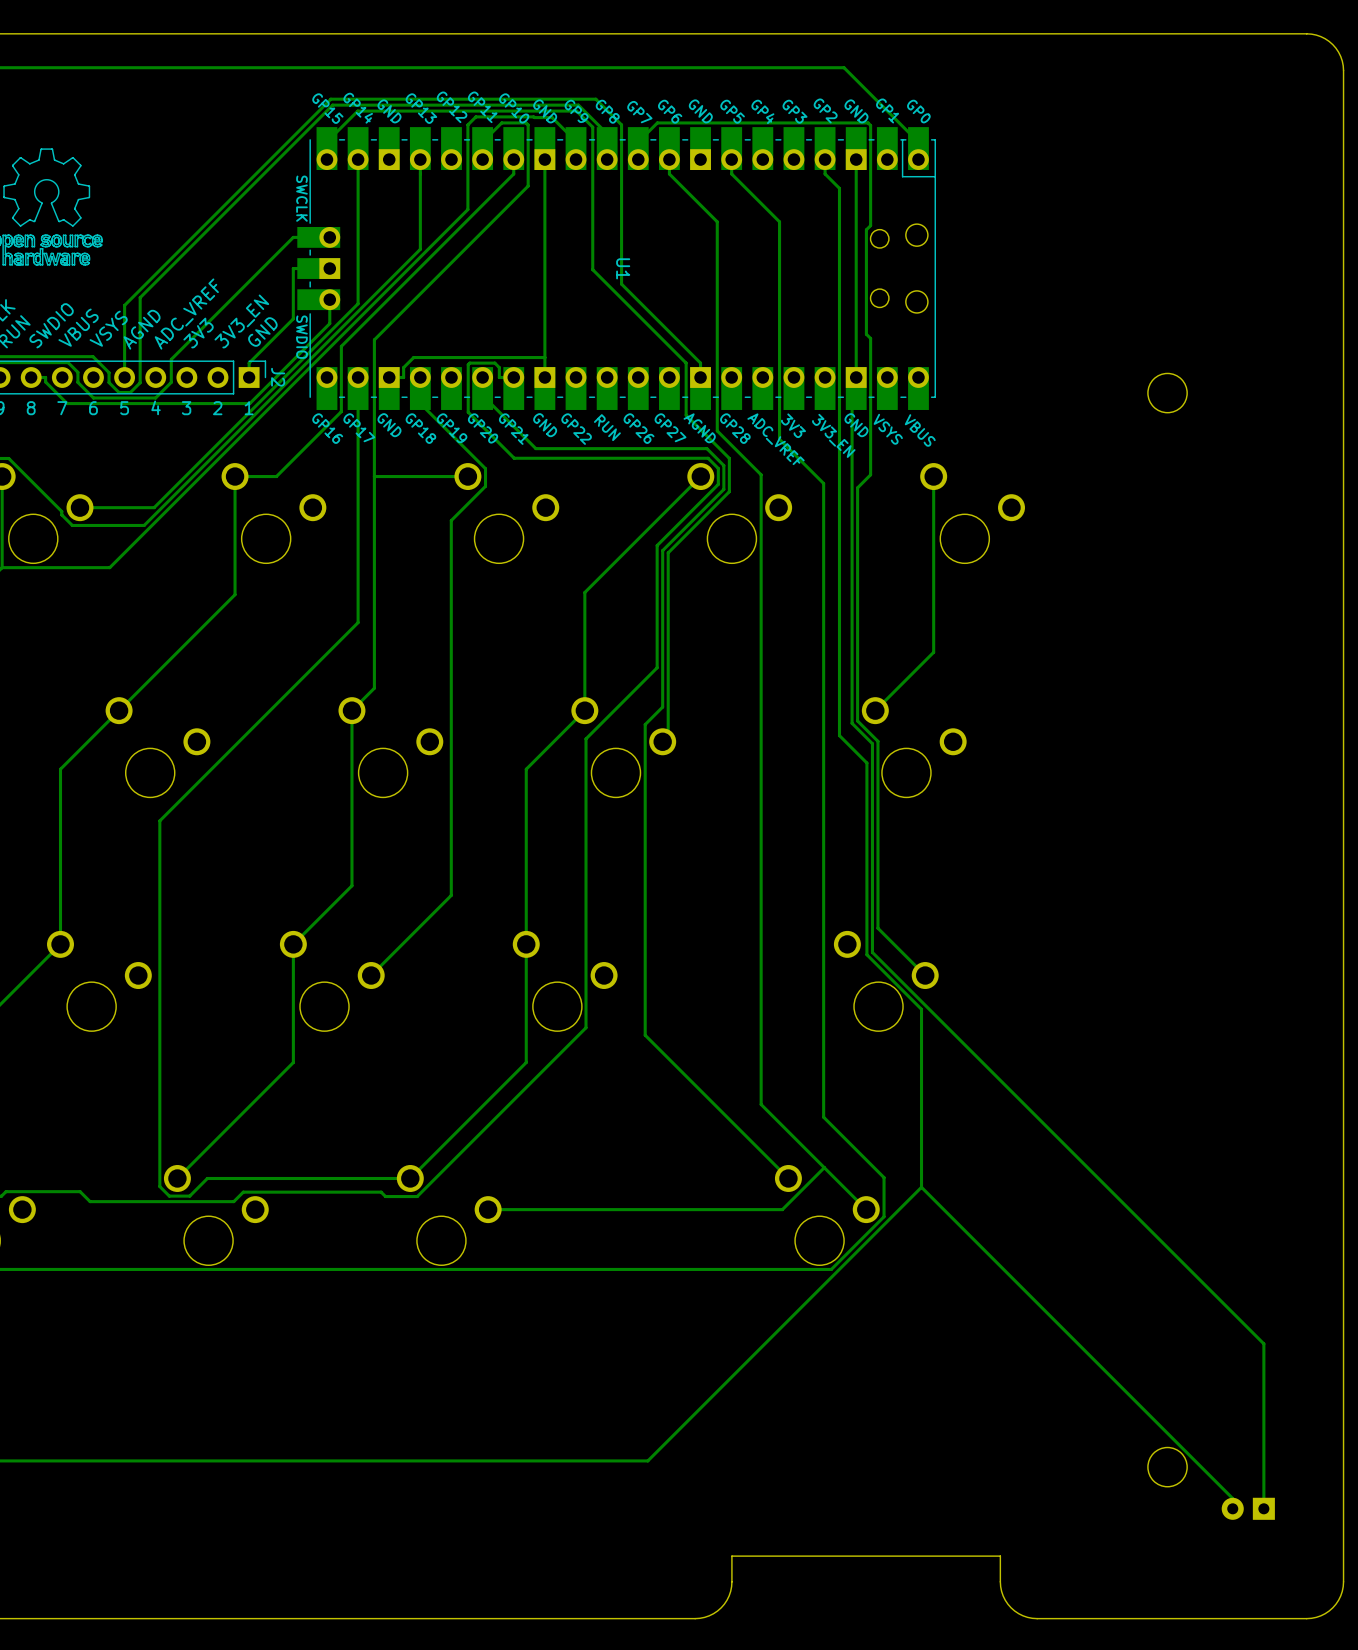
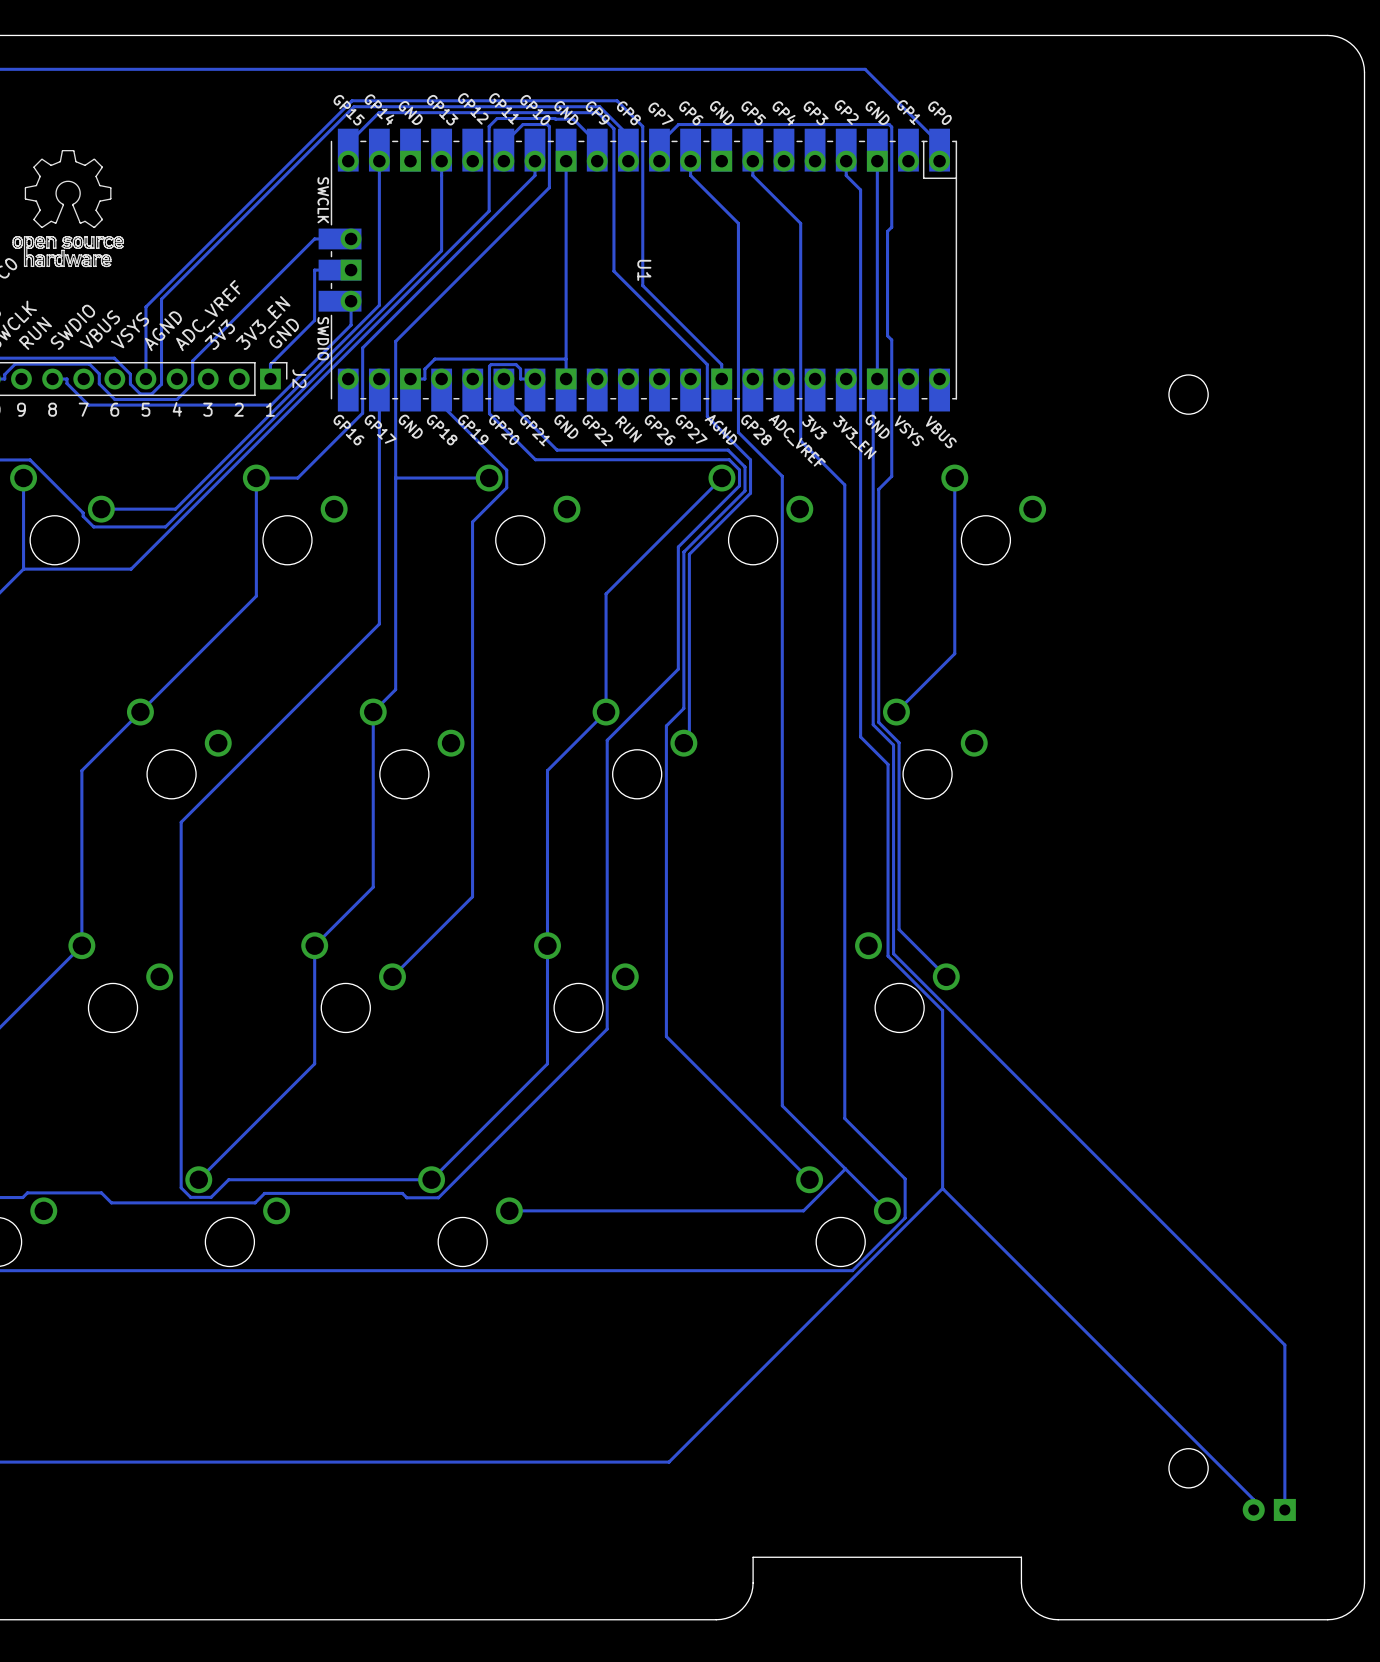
U1 footprint: [297, 127, 937, 410] -> [318, 128, 958, 412]

